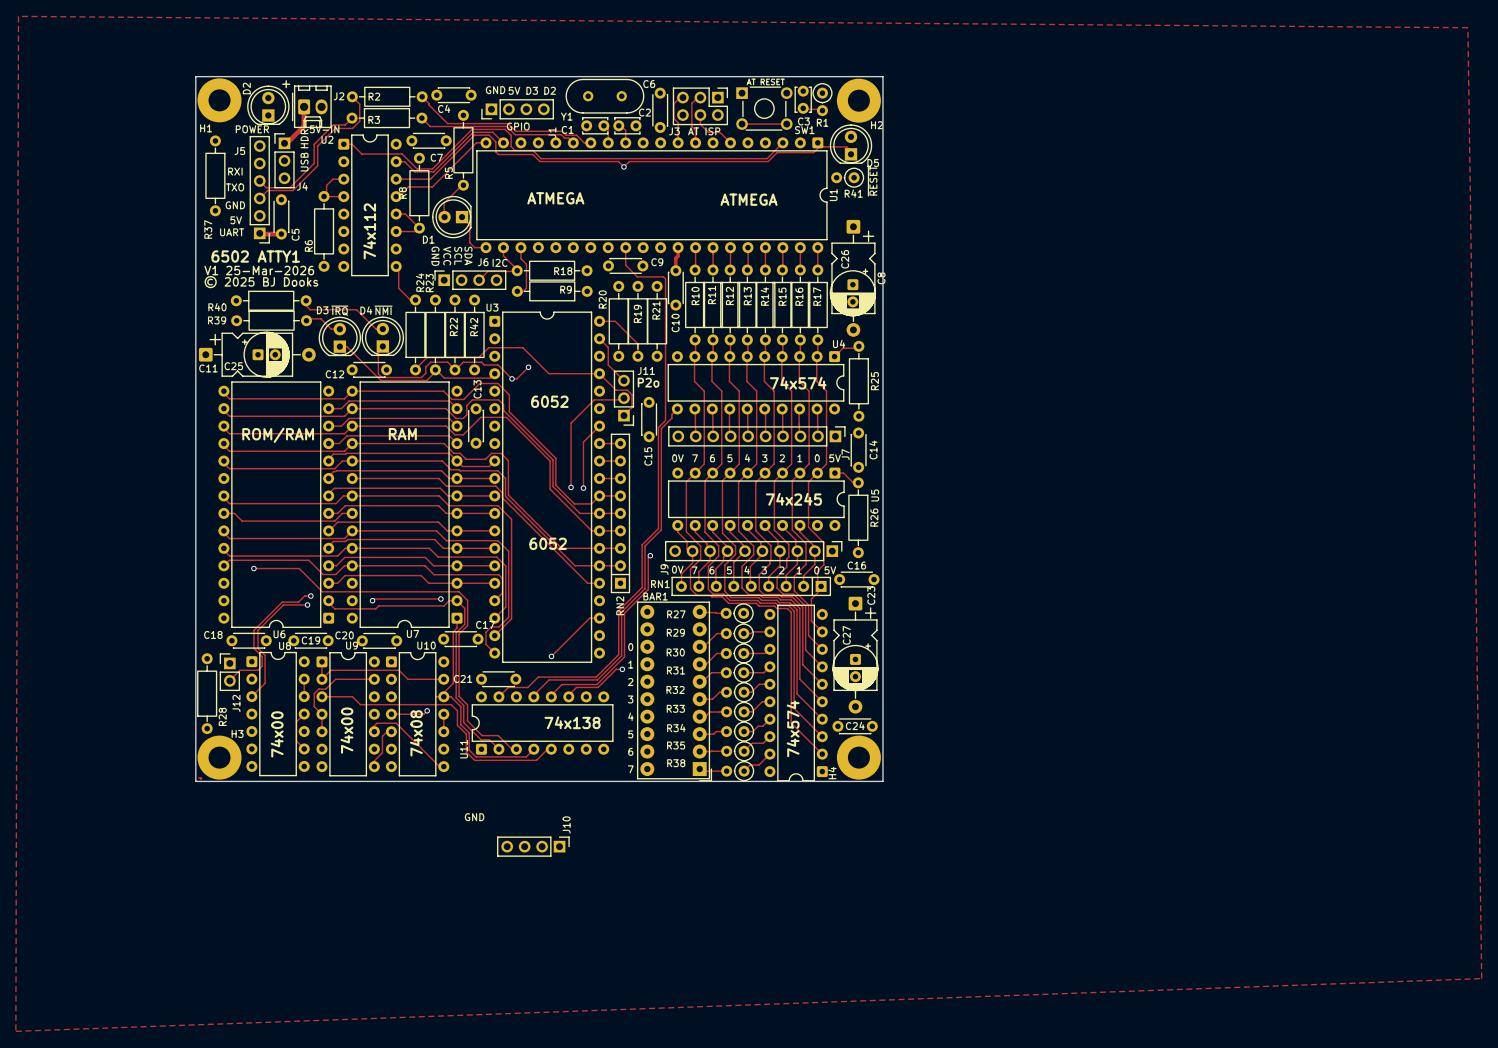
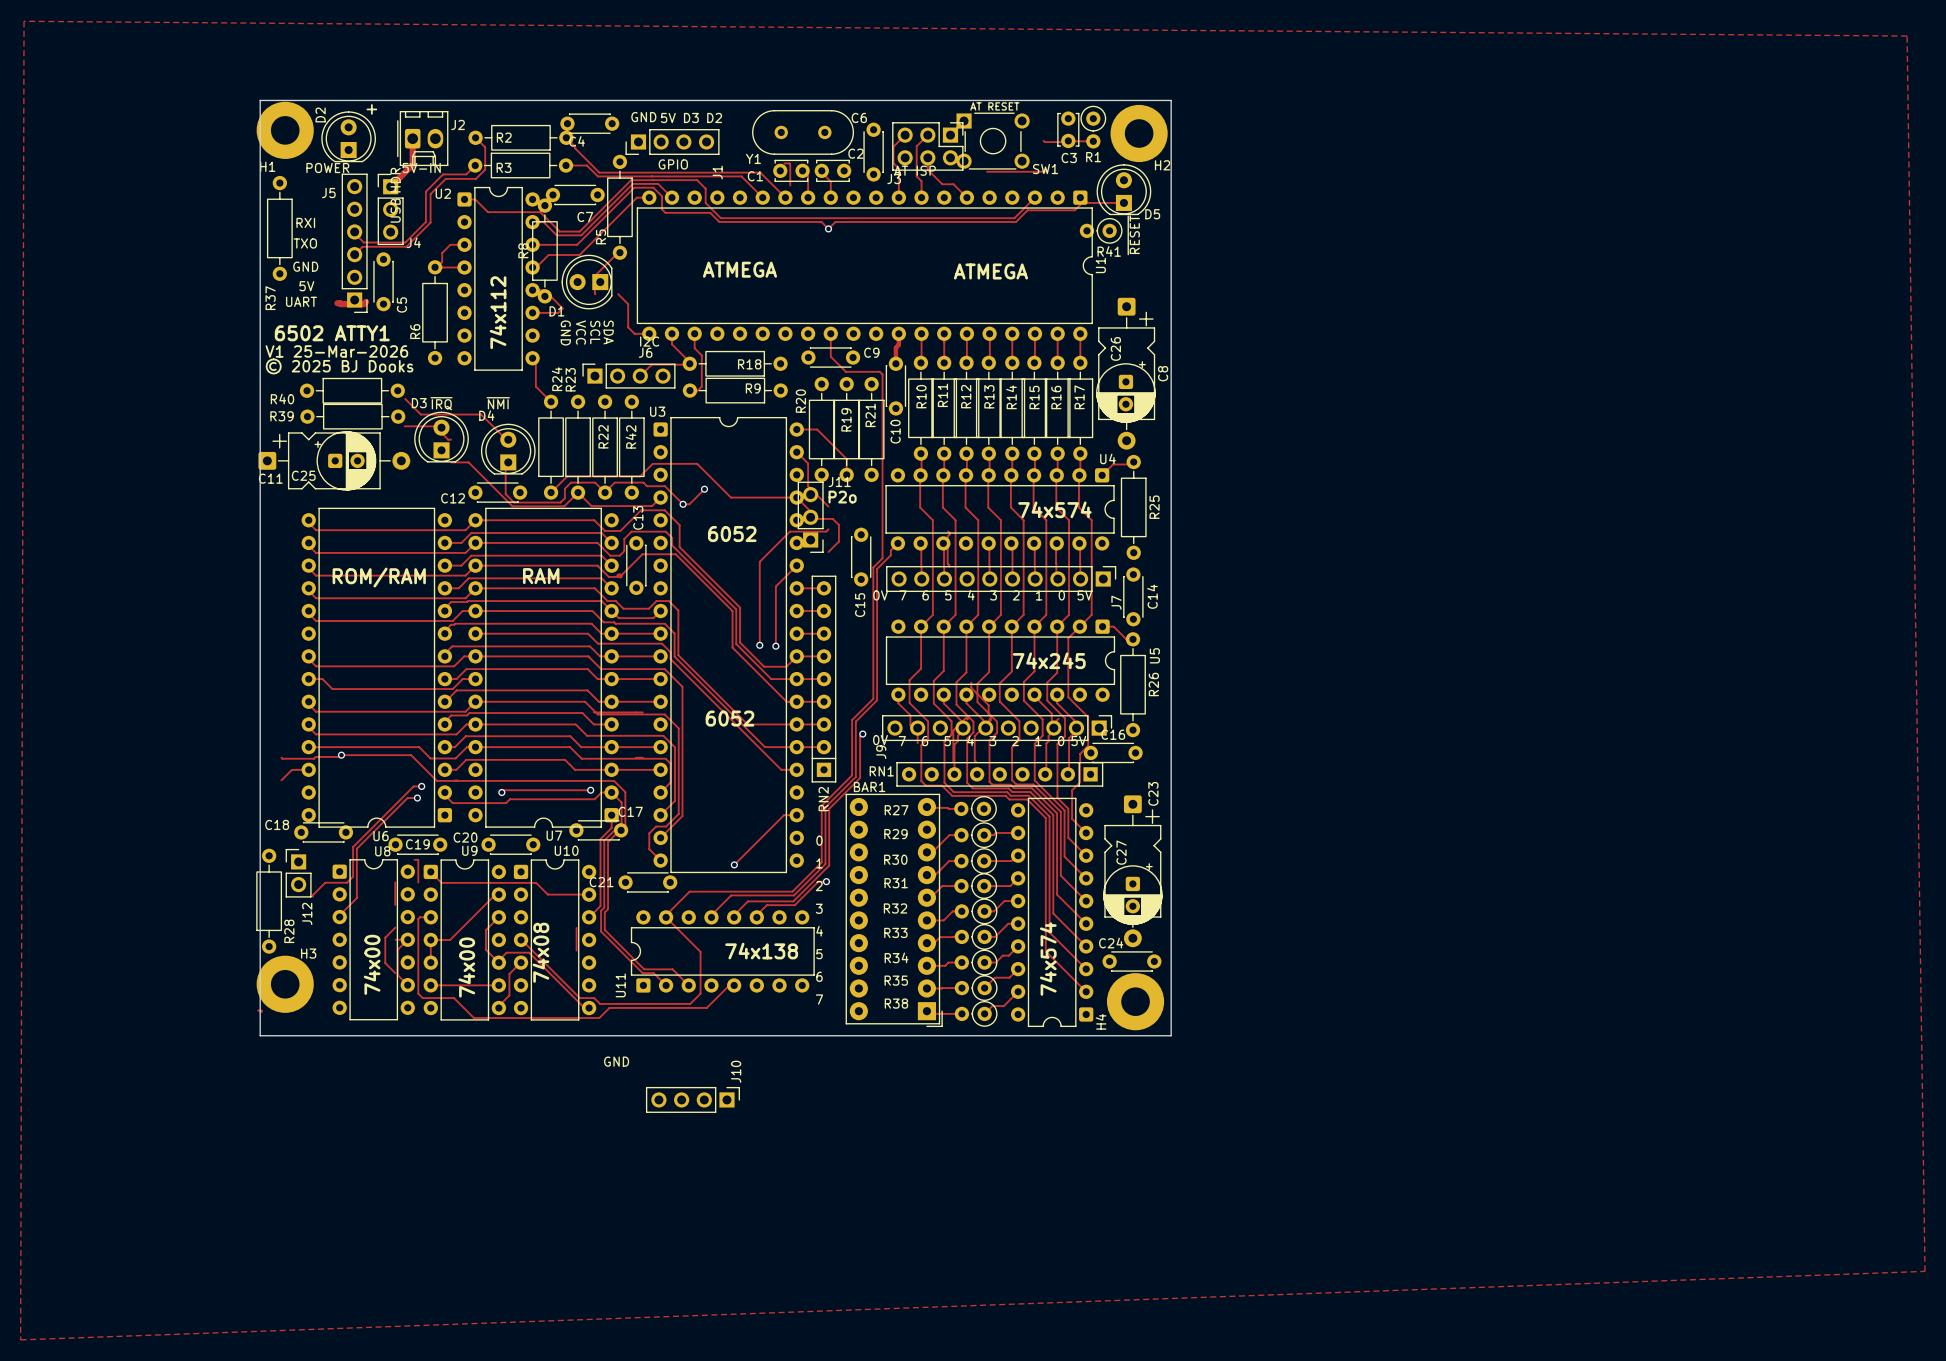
board edge: (195, 76) (882, 76) (882, 781) (195, 781) (195, 76) -> (260, 100) (260, 1035) (1171, 1035) (1171, 100) (260, 100)
track: (352, 96) (359, 104) (359, 121) (352, 128) (335, 128) (317, 146) (317, 165) (292, 190) (267, 190) (259, 198) -> none
R2 position: (387, 96) -> (520, 137)
track: (422, 96) (447, 123) (508, 123) (515, 131) (561, 131) (565, 135) (576, 135) (584, 142) (590, 142) -> none
Y1 position: (604, 96) -> (803, 132)
track: (682, 97) (681, 96) (673, 103) (673, 118) (678, 122) (678, 142) -> none
track: (700, 97) (698, 96) (691, 103) (691, 126) (695, 130) (695, 142) -> none
C3 position: (803, 99) -> (1068, 129)
R1 position: (822, 99) -> (1093, 127)
H2 position: (858, 100) -> (1139, 133)
track: none -> (905, 135) (893, 146) (893, 163) (898, 168) (898, 197)
track: none -> (927, 135) (916, 146) (916, 176) (921, 181) (921, 197)
track: (304, 106) (303, 126) (286, 143) (284, 143) -> none
J2 position: (311, 106) -> (422, 138)
track: none -> (412, 138) (412, 164) (390, 186)
track: none -> (475, 137) (485, 147) (485, 169) (475, 178) (445, 178) (430, 194) (430, 222) (406, 246) (362, 246) (354, 254)
track: none -> (566, 137) (599, 172) (760, 172) (785, 197)
J3 position: (700, 106) -> (927, 146)
track: none -> (1068, 140) (1093, 141)
C6 position: (660, 110) -> (873, 152)
track: (700, 115) (700, 124) (708, 132) (720, 132) (730, 142) -> none
track: (352, 118) (345, 124) (333, 124) (314, 144) (314, 163) (290, 187) (266, 187) (259, 181) -> none
R3 position: (386, 118) -> (520, 165)
track: (421, 118) (430, 126) (506, 126) (515, 134) (561, 134) (573, 142) -> none
track: none -> (927, 157) (927, 169) (942, 184) (953, 184) (966, 197)
track: (742, 124) (786, 124) -> (987, 171) (1045, 171)
C2 position: (595, 125) -> (791, 170)
track: (618, 125) (625, 130) (625, 142) -> none
C1 position: (627, 125) -> (832, 170)
track: none -> (475, 165) (466, 174) (443, 174) (425, 191) (425, 221) (405, 242) (363, 242) (354, 231)
track: none -> (565, 165) (586, 165) (597, 176) (651, 176)
track: none -> (820, 165) (822, 173) (830, 181) (830, 197)
track: none -> (802, 170) (808, 176) (808, 197)
track: none -> (651, 176) (741, 176) (762, 197)
track: none -> (653, 180) (697, 180) (705, 188) (705, 203) (720, 218) (1014, 218) (1034, 197)
track: none -> (653, 180) (631, 180) (579, 231) (559, 231) (540, 212) (487, 212) (475, 199) (464, 199)
C7 position: (429, 140) -> (575, 194)
track: (486, 142) (476, 142) (432, 186) (408, 186) (398, 196) (396, 196) -> (649, 197) (636, 197) (579, 254) (548, 254) (536, 267) (532, 267)
track: (503, 142) (492, 132) (473, 132) (433, 171) (414, 171) (404, 161) (396, 161) -> (671, 197) (658, 183) (632, 183) (581, 235) (556, 235) (543, 222) (532, 222)
track: (782, 142) (767, 158) (541, 158) (532, 150) (515, 150) (511, 146) (511, 135) (505, 129) (472, 129) (432, 168) (417, 168) (402, 154) (361, 154) (352, 144) (343, 144) -> none
D5 position: (851, 144) -> (1123, 189)
R5 position: (463, 150) -> (619, 207)
track: (851, 154) (851, 151) (846, 146) (823, 146) (817, 142) (817, 148) (813, 152) (777, 152) (768, 161) (629, 161) (623, 166) (618, 161) (539, 161) (532, 154) (498, 154) (495, 151) (495, 141) (489, 135) (474, 135) (430, 179) (396, 179) -> none
track: none -> (1123, 202) (1088, 202) (1080, 197) (1080, 204) (1074, 210) (1027, 210) (1015, 221) (835, 221) (828, 228) (821, 221) (719, 221) (710, 212) (665, 212) (662, 209) (662, 196) (653, 187) (634, 187) (577, 244) (532, 244)
J4 position: (284, 160) -> (390, 209)
via position: (623, 166) -> (828, 228)
track: (343, 179) (332, 179) (326, 185) (326, 192) (324, 194) (324, 196) (343, 196) -> none
track: (463, 185) (444, 203) (444, 217) -> (619, 252) (594, 275) (595, 294)
track: none -> (464, 244) (450, 244) (442, 253) (442, 261) (436, 267)
J5 position: (259, 189) -> (354, 243)
U1 position: (651, 195) -> (864, 265)
text position: ATMEGA (555, 198) -> ATMEGA (739, 269)
text position: ATMEGA (749, 199) -> ATMEGA (990, 271)
track: none -> (435, 267) (464, 267)
U2 position: (369, 205) -> (498, 278)
track: (396, 214) (405, 214) (419, 228) (415, 231) (396, 231) -> (532, 290) (544, 290) (562, 308) (558, 312) (532, 312)
C5 position: (281, 216) -> (383, 281)
track: (462, 217) (469, 224) (469, 242) (474, 247) (486, 247) -> (618, 294) (628, 304) (628, 327) (634, 333) (649, 333)
R6 position: (324, 231) -> (435, 312)
text position: 74x112 (369, 231) -> 74x112 (498, 312)
track: (503, 247) (503, 255) (517, 271) (487, 271) (479, 280) -> (671, 333) (671, 344) (689, 362) (689, 364) (688, 366) (684, 364) (651, 364) (640, 376)
track: (520, 247) (520, 258) (526, 264) (526, 288) (521, 293) (517, 291) -> (694, 333) (694, 348) (701, 355) (701, 386) (695, 393) (691, 393) (689, 390)
track: (625, 247) (625, 265) (637, 276) (663, 276) (665, 278) (665, 420) (658, 427) (658, 528) (642, 544) (642, 587) (618, 610) (618, 654) (596, 677) (538, 677) (527, 687) (508, 687) (498, 696) -> none
track: (678, 247) (675, 270) -> (898, 333) (898, 344) (895, 347) (895, 363)
track: (695, 247) (695, 266) -> (921, 333) (921, 358)
track: (713, 247) (713, 266) -> (944, 333) (944, 358)
track: (730, 247) (730, 266) -> (966, 333) (966, 358)
track: (747, 247) (748, 266) -> (989, 333) (989, 358)
track: (765, 247) (765, 266) -> (1012, 333) (1012, 358)
track: (782, 247) (782, 266) -> (1034, 333) (1034, 358)
track: (800, 247) (800, 266) -> (1057, 333) (1057, 358)
track: (817, 247) (817, 266) -> (1080, 333) (1080, 358)
track: none -> (830, 333) (830, 356) (845, 371) (879, 371) (882, 374) (882, 558) (873, 567) (873, 698) (852, 720) (852, 775) (821, 805) (821, 862) (792, 891) (689, 891) (665, 916) (700, 951) (700, 993) (690, 1003) (600, 1003) (594, 998) (579, 998) (521, 939)
C9 position: (625, 265) -> (830, 357)
track: (396, 266) (398, 266) (398, 288) (410, 299) (415, 299) -> none
R18 position: (552, 270) -> (735, 363)
track: none -> (532, 358) (535, 358) (535, 386) (551, 401)
C8 position: (853, 278) -> (1126, 373)
J6 position: (470, 280) -> (628, 376)
C10 position: (675, 287) -> (895, 386)
R9 position: (552, 291) -> (735, 390)
C26 position: (852, 292) -> (1125, 392)
track: (306, 300) (301, 301) (310, 309) (356, 309) (375, 328) (382, 329) -> none
R10 position: (695, 304) -> (920, 408)
R11 position: (712, 304) -> (944, 408)
R12 position: (730, 304) -> (966, 408)
R13 position: (747, 304) -> (988, 408)
R14 position: (765, 304) -> (1012, 408)
R15 position: (782, 304) -> (1034, 408)
R16 position: (800, 304) -> (1057, 408)
R17 position: (817, 304) -> (1080, 408)
track: none -> (405, 398) (420, 414) (481, 414) (508, 439)
track: (306, 320) (308, 318) (320, 318) (331, 329) (339, 329) -> none
track: (599, 321) (615, 321) (637, 344) (637, 356) -> (796, 429) (817, 429) (846, 459) (846, 474)
R20 position: (618, 321) -> (821, 429)
R19 position: (637, 321) -> (846, 429)
R21 position: (657, 321) -> (871, 429)
track: none -> (404, 426) (434, 426) (448, 439) (451, 439)
R24 position: (415, 334) -> (551, 447)
R23 position: (435, 334) -> (578, 447)
R22 position: (455, 334) -> (605, 447)
R42 position: (474, 334) -> (631, 447)
D4 position: (382, 336) -> (508, 449)
track: (695, 336) (694, 381) (704, 391) (704, 463) (686, 481) (686, 531) (700, 546) (700, 559) (690, 569) (690, 588) (697, 595) (722, 596) (728, 603) (756, 603) (759, 606) (787, 608) (791, 612) (791, 723) (822, 754) -> none
track: (713, 336) (711, 381) (721, 391) (721, 463) (705, 480) (705, 532) (718, 545) (718, 556) (708, 566) (708, 589) (713, 594) (723, 594) (729, 600) (757, 600) (760, 603) (775, 603) (778, 605) (788, 605) (794, 611) (794, 708) (822, 736) -> none
track: (730, 336) (729, 381) (739, 391) (739, 463) (722, 480) (722, 533) (735, 546) (735, 554) (724, 565) (724, 591) (731, 597) (758, 597) (761, 600) (789, 602) (797, 609) (797, 693) (822, 719) -> none
track: (748, 336) (746, 381) (756, 391) (756, 463) (738, 482) (738, 531) (753, 546) (753, 554) (742, 566) (742, 588) (748, 594) (791, 599) (799, 608) (799, 679) (822, 701) -> none
track: (765, 336) (764, 381) (774, 391) (774, 463) (755, 482) (755, 530) (770, 545) (770, 563) (759, 574) (759, 589) (763, 594) (792, 596) (802, 607) (802, 664) (822, 684) -> none
track: (782, 336) (781, 381) (791, 391) (791, 463) (774, 481) (774, 530) (788, 544) (786, 567) (777, 576) (777, 588) (783, 594) (793, 594) (805, 606) (805, 650) (822, 666) -> none
track: (800, 336) (799, 381) (809, 391) (809, 463) (792, 480) (792, 530) (805, 543) (805, 564) (794, 576) (794, 590) (808, 605) (808, 635) (822, 649) -> none
track: (817, 336) (816, 381) (826, 391) (826, 463) (808, 481) (808, 527) (823, 542) (823, 564) (817, 571) (817, 592) (811, 599) (811, 621) (822, 631) -> (1080, 448) (1078, 507) (1091, 520) (1091, 614) (1068, 638) (1068, 697) (1088, 717) (1088, 745) (1080, 753) (1080, 782) (1072, 790) (1072, 818) (1086, 832)
track: (599, 338) (608, 347) (608, 364) (623, 380) -> (796, 452) (808, 463) (808, 486) (828, 506)
track: none -> (921, 448) (920, 507) (932, 520) (932, 614) (921, 626) (921, 668) (909, 680) (909, 702) (928, 721) (928, 738) (921, 745) (921, 781) (925, 785) (942, 785) (952, 795) (1005, 795) (1009, 799) (1027, 799) (1045, 818) (1045, 951) (1086, 991)
track: none -> (944, 448) (942, 507) (955, 520) (955, 614) (943, 626) (943, 670) (933, 680) (933, 703) (951, 721) (951, 734) (944, 741) (944, 782) (953, 792) (1007, 792) (1010, 795) (1028, 795) (1049, 816) (1049, 932) (1086, 969)
track: none -> (966, 448) (965, 507) (978, 520) (978, 614) (966, 626) (966, 672) (956, 682) (956, 704) (973, 721) (973, 732) (967, 738) (967, 782) (972, 788) (1008, 788) (1012, 792) (1030, 792) (1053, 814) (1053, 913) (1086, 946)
track: none -> (989, 448) (988, 507) (1000, 520) (1000, 614) (989, 626) (989, 672) (977, 683) (977, 702) (997, 721) (997, 732) (989, 740) (989, 781) (992, 784) (1010, 784) (1014, 788) (1031, 788) (1057, 813) (1057, 894) (1086, 923)
track: none -> (1012, 448) (1010, 507) (1023, 520) (1023, 614) (1011, 626) (1011, 671) (999, 683) (999, 701) (1019, 721) (1019, 739) (1012, 747) (1012, 780) (1016, 784) (1033, 784) (1060, 811) (1060, 875) (1086, 901)
track: none -> (1034, 448) (1033, 507) (1046, 520) (1046, 614) (1034, 626) (1034, 671) (1023, 681) (1023, 700) (1042, 719) (1042, 735) (1034, 743) (1034, 780) (1064, 810) (1064, 856) (1086, 878)
track: none -> (1057, 448) (1056, 507) (1069, 520) (1069, 614) (1057, 626) (1057, 672) (1047, 682) (1047, 700) (1064, 718) (1064, 736) (1057, 743) (1057, 797) (1068, 808) (1068, 837) (1086, 855)
track: (339, 346) (346, 346) (380, 380) (426, 380) (435, 369) -> none
track: (382, 346) (378, 350) (378, 373) (381, 377) (421, 377) (425, 373) (425, 367) (430, 362) (447, 362) (455, 369) -> none
track: (858, 346) (858, 348) (842, 348) (834, 356) -> (1133, 462) (1133, 464) (1113, 464) (1102, 475)
track: none -> (451, 462) (468, 462) (512, 506) (564, 506) (578, 492)
track: none -> (508, 462) (505, 462) (505, 494) (514, 502) (560, 502) (564, 498) (564, 488) (570, 482) (595, 482) (605, 492)
track: (528, 367) (516, 378) (512, 378) (498, 364) (484, 364) (481, 362) (463, 362) (455, 370) (451, 370) -> none
via: (528, 367) -> none
C12 position: (369, 369) -> (497, 492)
track: (415, 369) (427, 357) (478, 357) (488, 347) (522, 347) (548, 373) (599, 373) (615, 390) (627, 390) (631, 394) (631, 407) (623, 415) -> none
track: (431, 369) (435, 369) (444, 378) (490, 378) (494, 373) -> none
track: none -> (704, 489) (689, 504) (683, 504) (664, 486) (647, 486) (643, 482) (614, 482) (604, 492)
via: none -> (704, 489)
track: none -> (577, 492) (591, 506) (652, 506) (660, 497)
via: (512, 378) -> none
track: none -> (551, 492) (567, 476) (640, 476) (652, 463) (697, 463) (730, 497) (796, 497) (818, 518) (832, 518) (838, 525) (838, 541) (828, 552)
R25 position: (858, 381) -> (1133, 507)
U4 position: (755, 382) -> (1000, 509)
text position: 74x574 (798, 383) -> 74x574 (1054, 509)
via: none -> (683, 504)
track: (223, 391) (229, 398) (344, 398) (352, 391) (443, 391) (451, 399) (463, 399) (479, 383) (497, 383) (509, 394) (509, 411) (517, 419) -> (308, 542) (307, 544) (316, 552) (465, 552) (475, 542) (597, 542) (610, 555) (619, 555) (624, 551) (624, 538) (631, 531) (665, 531) (672, 537) (672, 545)
track: (623, 398) (622, 399) (594, 399) (571, 423) (571, 487) -> (828, 529) (826, 531) (789, 531) (759, 561) (759, 645)
track: none -> (308, 520) (307, 522) (316, 530) (465, 530) (475, 520) (594, 520) (605, 531) (620, 531) (641, 510) (664, 510) (679, 525) (679, 547) (740, 607) (740, 642) (764, 666) (786, 666) (796, 656) (823, 656)
text position: 6052 (549, 401) -> 6052 (732, 534)
track: (223, 408) (229, 416) (344, 416) (352, 408) (446, 408) (455, 418) (463, 418) (466, 414) (466, 405) (472, 399) (498, 399) (503, 404) (503, 410) (552, 459) (552, 486) (579, 513) (620, 513) -> none
track: (328, 408) (341, 408) (349, 400) (449, 400) (457, 408) -> (444, 542) (461, 542) (471, 532) (601, 532) (611, 542)
track: (677, 408) (671, 414) (671, 418) (661, 428) (661, 529) (645, 546) (645, 588) (621, 612) (621, 655) (597, 679) (549, 679) (533, 696) -> (897, 543) (890, 550) (890, 555) (877, 569) (877, 700) (855, 721) (855, 776) (825, 807) (825, 863) (794, 895) (731, 895) (710, 916) (711, 917)
track: (694, 408) (695, 436) -> (920, 543) (921, 579)
track: (712, 408) (713, 436) -> (943, 543) (944, 579)
track: (747, 408) (748, 436) -> (988, 543) (989, 579)
track: (764, 408) (765, 436) -> (1011, 543) (1012, 544) (1012, 579)
track: (782, 408) (783, 436) -> (1034, 543) (1035, 579)
track: (799, 408) (800, 436) -> (1056, 543) (1058, 544) (1056, 548) (1057, 579)
track: (817, 408) (817, 436) -> (1079, 543) (1080, 579)
C15 position: (649, 419) -> (861, 557)
track: (223, 426) (229, 433) (344, 433) (352, 426) (446, 426) (454, 434) (463, 434) (480, 417) (506, 417) (550, 461) (550, 489) (591, 530) (620, 530) -> (308, 565) (307, 567) (316, 575) (465, 575) (475, 565) (597, 565) (608, 576) (619, 576) (642, 554) (675, 554) (732, 611) (732, 647) (786, 701) (823, 701)
track: (328, 426) (341, 426) (349, 418) (449, 418) (457, 426) -> (444, 565) (461, 565) (471, 555) (601, 555) (611, 565)
C13 position: (476, 426) -> (636, 565)
track: (599, 426) (583, 442) (583, 488) -> (796, 565) (775, 586) (775, 646)
text position: RAM (402, 434) -> RAM (541, 576)
text position: ROM/RAM (278, 435) -> ROM/RAM (379, 577)
J7 position: (756, 436) -> (1001, 579)
track: (223, 443) (229, 451) (344, 451) (352, 443) (444, 443) (453, 453) (460, 453) (466, 459) (485, 459) (491, 453) (501, 453) (508, 460) (508, 495) (561, 548) (620, 548) -> (308, 588) (307, 590) (316, 598) (465, 598) (475, 588) (594, 588) (607, 601) (615, 601) (623, 608) (648, 608) (656, 601) (668, 601) (678, 610) (678, 655) (747, 724) (823, 724)
track: (328, 443) (339, 443) (347, 435) (449, 435) (457, 443) -> (444, 588) (458, 588) (468, 578) (601, 578) (611, 588)
track: (599, 443) (620, 443) -> (796, 588) (823, 588)
C14 position: (858, 450) -> (1133, 596)
track: (555, 458) (555, 485) (574, 503) (591, 503) (599, 495) (620, 495) -> (722, 595) (736, 609) (736, 644) (771, 679) (823, 679)
track: (223, 461) (229, 468) (334, 468) (342, 461) (442, 461) (451, 469) (497, 470) (505, 478) (505, 496) (575, 565) (620, 565) -> (308, 611) (307, 612) (316, 620) (452, 620) (462, 611) (592, 611) (603, 622) (664, 623) (674, 633) (674, 656) (764, 747) (823, 747)
track: (328, 461) (333, 454) (346, 453) (449, 453) (462, 466) (489, 466) (494, 461) -> (444, 611) (443, 609) (451, 602) (468, 601) (601, 601) (618, 618) (653, 618) (660, 611)
track: (599, 461) (620, 461) -> (796, 611) (823, 611)
track: (834, 473) (843, 473) (853, 482) (858, 482) -> (1102, 626) (1113, 626) (1126, 639) (1133, 639)
track: (328, 478) (333, 471) (336, 470) (441, 470) (449, 478) (494, 478) -> (444, 633) (443, 631) (451, 624) (455, 623) (591, 623) (601, 633) (660, 633)
track: (352, 478) (438, 478) (446, 486) (495, 486) (502, 492) (502, 498) (587, 583) (599, 583) -> (475, 633) (588, 633) (598, 643) (662, 643) (670, 652) (670, 659) (781, 769) (796, 769)
track: (599, 478) (620, 478) -> (796, 633) (823, 633)
U3 position: (547, 487) -> (728, 645)
via: (571, 487) -> none
via: (583, 488) -> none
track: (223, 495) (229, 503) (335, 503) (343, 495) (439, 495) (448, 505) (497, 505) (511, 519) (511, 618) (494, 635) -> (308, 656) (307, 658) (316, 666) (454, 666) (464, 656) (588, 656) (601, 669) (664, 669) (682, 686) (682, 816) (660, 837)
track: (328, 495) (334, 488) (440, 488) (448, 495) (494, 495) -> (444, 656) (443, 654) (452, 646) (590, 646) (599, 656) (660, 656)
via: none -> (759, 645)
via: none -> (775, 646)
U5 position: (756, 499) -> (1000, 660)
text position: 74x245 (793, 499) -> 74x245 (1049, 660)
U6 position: (276, 504) -> (376, 667)
U7 position: (404, 504) -> (543, 667)
track: (223, 513) (234, 513) (242, 521) (334, 521) (342, 513) (352, 513) -> (308, 679) (322, 679) (332, 689) (452, 689) (462, 679) (475, 679)
track: (328, 513) (337, 513) (345, 505) (438, 505) (446, 513) (494, 513) -> (444, 679) (456, 679) (466, 669) (587, 669) (597, 679) (660, 679)
RN2 position: (620, 513) -> (823, 679)
R26 position: (858, 517) -> (1133, 684)
track: (677, 525) (677, 532) (687, 541) (687, 548) (692, 551) (692, 562) -> (898, 694) (898, 703) (910, 715) (910, 725) (917, 728) (917, 743)
track: (695, 525) (695, 532) (706, 543) (706, 548) (710, 551) (710, 560) (698, 571) (698, 586) -> none
track: (712, 525) (712, 532) (726, 545) (727, 551) (723, 561) (715, 568) (716, 586) -> none
track: (730, 525) (730, 532) (743, 545) (744, 551) -> (966, 694) (966, 703) (983, 720) (983, 725) (985, 728)
track: (765, 525) (777, 540) (777, 549) (779, 551) (779, 565) (768, 576) (768, 586) -> none
track: (782, 525) (795, 539) (797, 551) (797, 564) (786, 575) (786, 586) -> none
track: (800, 525) (800, 532) (812, 545) (814, 551) (814, 564) (803, 575) (803, 586) -> none
track: (223, 530) (229, 538) (344, 538) (352, 530) (436, 530) (446, 540) (497, 540) (508, 551) (508, 617) (498, 626) (491, 626) (486, 632) (486, 644) (494, 653) -> (308, 701) (307, 703) (316, 711) (465, 711) (475, 701) (585, 701) (597, 714) (664, 714) (678, 728) (678, 813) (666, 826) (656, 826) (649, 833) (649, 849) (660, 860)
track: (328, 530) (337, 522) (438, 522) (447, 530) (494, 530) -> (444, 701) (456, 690) (587, 690) (598, 701) (660, 701)
track: none -> (943, 694) (943, 703) (961, 720) (963, 728) (954, 744) (954, 774)
track: none -> (1034, 694) (1051, 713) (1053, 730) (1048, 736) (1048, 741) (1046, 743) (1046, 771) (1050, 772)
track: none -> (1057, 694) (1057, 703) (1074, 720) (1074, 725) (1076, 728) (1076, 730) (1069, 738) (1069, 771) (1072, 772)
text position: 6052 (548, 543) -> 6052 (730, 718)
track: (223, 548) (229, 556) (337, 556) (345, 548) (429, 548) (438, 557) (496, 557) (505, 565) (505, 607) (494, 618) -> (308, 724) (307, 726) (316, 734) (456, 734) (466, 724) (575, 724) (587, 735) (663, 735) (674, 747) (674, 800) (660, 815)
track: (328, 548) (333, 541) (345, 541) (347, 539) (434, 539) (443, 548) (457, 548) -> (444, 724) (443, 722) (451, 715) (467, 715) (469, 713) (582, 713) (593, 724) (611, 724)
J9 position: (753, 551) -> (997, 728)
track: (650, 555) (648, 557) (648, 589) (624, 613) (624, 656) (596, 684) (561, 684) (551, 696) -> (862, 734) (860, 736) (860, 777) (829, 808) (829, 865) (793, 901) (747, 901) (733, 916) (734, 917)
via position: (650, 555) -> (862, 734)
track: (692, 563) (681, 573) (681, 586) -> none
track: (223, 565) (229, 560) (308, 560) (323, 574) (335, 574) (344, 565) (425, 565) (433, 574) (498, 574) (502, 578) (502, 593) (494, 600) -> none
track: (328, 565) (336, 565) (344, 557) (425, 557) (433, 565) (494, 565) -> (444, 747) (454, 747) (465, 736) (570, 736) (581, 747) (660, 747)
track: (253, 568) (299, 568) (322, 591) (458, 591) (467, 600) (467, 625) (459, 634) (459, 696) (467, 704) (467, 720) (482, 735) (498, 735) (511, 749) (516, 749) -> none
via position: (253, 568) -> (341, 755)
track: none -> (308, 747) (419, 747) (430, 758) (455, 758) (467, 747) (570, 747) (581, 758) (665, 758) (670, 763) (670, 782) (660, 792)
track: none -> (281, 757) (313, 758) (315, 756) (339, 756) (341, 755) (411, 755) (436, 780) (614, 780) (625, 792) (625, 824) (608, 842) (608, 909) (604, 912) (604, 929) (644, 969) (672, 969) (688, 985)
track: (328, 583) (337, 583) (345, 575) (421, 575) (428, 583) (457, 583) -> (444, 769) (456, 769) (466, 759) (565, 759) (574, 769) (611, 769)
track: (457, 583) (489, 583) -> (611, 769) (653, 769)
RN1 position: (751, 586) -> (999, 774)
track: none -> (308, 769) (291, 769) (281, 780)
track: (310, 596) (304, 596) (298, 602) (282, 602) (253, 630) (253, 648) (262, 656) (262, 666) (258, 670) (239, 670) (229, 680) -> none
via: (310, 596) -> none
track: (440, 598) (374, 598) (372, 600) -> (590, 790) (504, 790) (501, 792)
via position: (440, 598) -> (590, 790)
track: (328, 600) (334, 608) (375, 608) (378, 605) (444, 605) (449, 600) (457, 600) (464, 608) (464, 624) (456, 632) (456, 697) (463, 705) (463, 722) (480, 739) (489, 739) (498, 749) -> none
via position: (372, 600) -> (501, 792)
track: (307, 604) (283, 604) (258, 630) (258, 648) (265, 655) (265, 683) (251, 696) -> none
via: (307, 604) -> none
track: none -> (421, 786) (413, 786) (353, 847) (353, 876) (347, 882) (325, 882) (312, 896)
via: none -> (421, 786)
track: none -> (444, 792) (443, 794) (452, 803) (506, 803) (509, 799) (594, 799) (601, 792) (611, 792) (621, 802) (621, 823) (604, 840) (604, 907) (601, 910) (601, 931) (642, 973) (653, 973) (666, 985)
track: (699, 611) (726, 613) -> (926, 806) (961, 808)
R27 position: (737, 613) -> (975, 808)
track: none -> (417, 798) (407, 798) (356, 848) (356, 898) (339, 917)
via: none -> (417, 798)
track: (457, 618) (457, 628) (453, 631) (453, 683) (441, 694) (442, 696) -> none
track: (596, 621) (599, 618) (589, 618) (551, 656) -> (792, 819) (796, 815) (784, 815) (734, 864)
track: none -> (611, 815) (611, 827) (600, 839) (600, 906) (589, 917) (584, 917)
track: (769, 631) (743, 633) -> (1018, 832) (984, 835)
track: (726, 633) (717, 633) (703, 646) (699, 646) -> (961, 835) (949, 835) (932, 852) (926, 852)
R29 position: (737, 633) -> (975, 835)
C19 position: (310, 640) -> (417, 844)
C20 position: (379, 640) -> (510, 844)
track: (769, 649) (764, 653) (744, 653) -> (1018, 855) (1011, 861) (984, 861)
track: (726, 653) (716, 653) (706, 664) (699, 664) -> (961, 861) (949, 861) (935, 875) (926, 875)
R30 position: (737, 653) -> (975, 861)
C23 position: (855, 655) -> (1132, 871)
via position: (551, 656) -> (734, 864)
track: (769, 666) (763, 672) (743, 672) -> (1018, 878) (1010, 886) (984, 886)
C27 position: (855, 667) -> (1132, 894)
track: (622, 669) (616, 669) (598, 687) (576, 687) (568, 696) -> (826, 881) (818, 881) (794, 905) (766, 905) (755, 916) (756, 917)
via position: (622, 669) -> (826, 881)
track: none -> (430, 872) (441, 882) (536, 882) (547, 894) (589, 894)
track: (726, 672) (711, 672) (702, 681) (699, 681) -> (961, 886) (942, 886) (930, 897) (926, 897)
R31 position: (737, 672) -> (975, 886)
track: (321, 679) (330, 670) (398, 670) (407, 679) (443, 679) -> none
track: (374, 679) (335, 679) (325, 689) (318, 689) (314, 693) (314, 706) (321, 714) -> (430, 917) (419, 917) (418, 927)
track: (769, 684) (759, 684) (751, 692) (744, 692) -> (1018, 901) (1004, 901) (994, 911) (984, 911)
track: none -> (498, 894) (495, 894) (450, 939) (430, 939) (430, 962)
BAR1 position: (674, 691) -> (894, 910)
track: (726, 692) (719, 692) (712, 699) (699, 699) -> (961, 911) (952, 911) (943, 920) (926, 920)
R32 position: (737, 692) -> (975, 911)
part position: (796, 693) -> (1052, 912)
track: (321, 696) (352, 696) (360, 704) (451, 704) (457, 710) (457, 725) (466, 734) (466, 752) (474, 760) (536, 760) (547, 749) (551, 749) -> none
track: (436, 696) (450, 696) (460, 706) (460, 724) (469, 733) (469, 750) (476, 756) (526, 756) (533, 749) -> none
track: (769, 701) (762, 701) (752, 711) (744, 711) (745, 715) -> (1018, 923) (1008, 923) (995, 936) (984, 936) (985, 942)
track: none -> (498, 917) (485, 930) (485, 949) (498, 962) (506, 952) (529, 952) (584, 1008) (589, 1008)
track: (427, 710) (423, 714) (391, 714) -> none
via: (427, 710) -> none
track: (726, 711) (709, 712) (703, 718) (699, 716) -> (961, 936) (940, 937) (931, 945) (926, 943)
R33 position: (737, 711) -> (976, 936)
U8 position: (278, 714) -> (373, 939)
U9 position: (348, 714) -> (464, 939)
U10 position: (417, 714) -> (555, 939)
track: (769, 719) (762, 726) (758, 726) (752, 731) (744, 731) (745, 733) -> (1018, 946) (1008, 955) (1002, 955) (995, 962) (984, 962) (986, 964)
text position: 74x138 (572, 722) -> 74x138 (761, 951)
track: none -> (395, 939) (407, 939) (397, 949) (397, 975) (407, 985)
U11 position: (542, 723) -> (722, 951)
C24 position: (855, 726) -> (1131, 961)
text position: 74x574 (793, 728) -> 74x574 (1048, 959)
text position: 74x00 (346, 730) -> 74x00 (466, 967)
track: none -> (418, 950) (418, 993) (422, 998) (453, 998) (473, 1018) (599, 1018) (609, 1007) (706, 1007) (729, 985) (734, 985)
track: (374, 731) (372, 727) (376, 723) (396, 723) (439, 766) (443, 766) -> none
track: (391, 731) (387, 731) (382, 736) (382, 752) (372, 762) (374, 766) -> none
track: (726, 731) (699, 734) -> (961, 962) (948, 962) (945, 965) (926, 965)
R34 position: (737, 731) -> (976, 962)
text position: 74x00 (277, 734) -> 74x00 (372, 964)
track: (769, 736) (763, 743) (752, 743) (744, 751) (744, 754) -> (1018, 969) (1009, 977) (995, 977) (984, 988) (985, 992)
track: none -> (521, 962) (509, 974) (509, 995) (498, 1008)
track: (726, 751) (699, 751) -> (961, 988) (926, 988)
R35 position: (737, 751) -> (976, 988)
track: (769, 754) (758, 765) (750, 765) (744, 773) -> (1018, 991) (1003, 1006) (992, 1006) (984, 1013) (985, 1016)
H4 position: (858, 757) -> (1135, 1001)
track: none -> (430, 985) (498, 985)
track: (699, 769) (701, 771) (726, 771) -> (926, 1011) (929, 1013) (961, 1013)
R38 position: (737, 771) -> (976, 1013)

